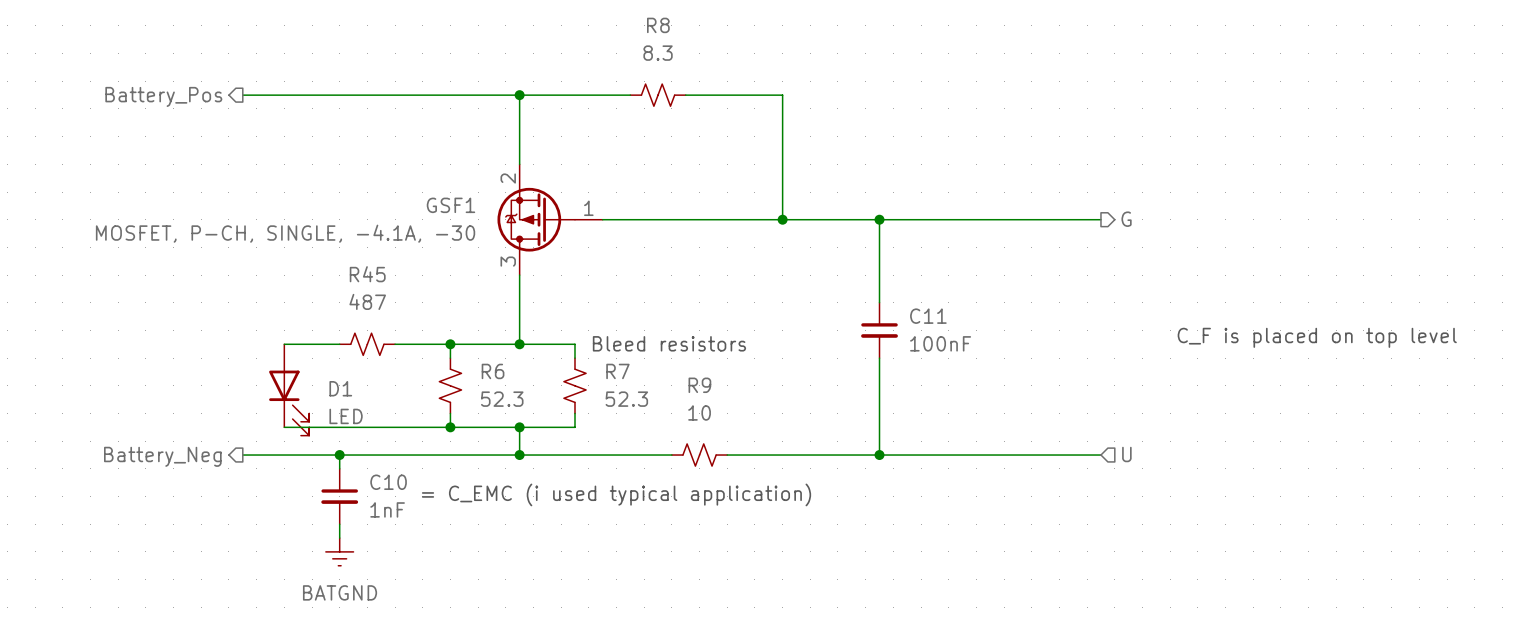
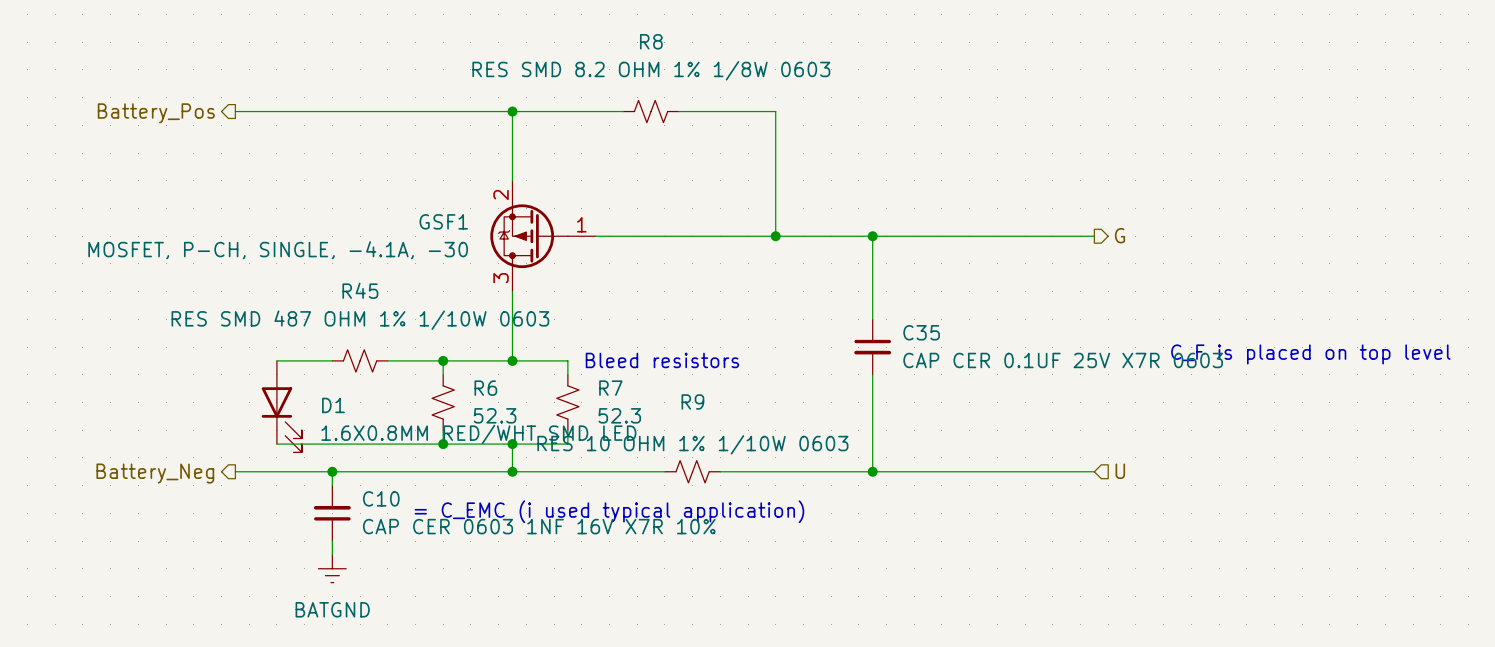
R8 value: 8.3 (658, 53) -> RES SMD 8.2 OHM 1% 1/8W 0603 (651, 70)
R45 value: 487 (367, 301) -> RES SMD 487 OHM 1% 1/10W 0603 (360, 320)
C11 name: C11 (928, 316) -> C35 (921, 332)
C11 value: 100nF (940, 343) -> CAP CER 0.1UF 25V X7R 0603 (1063, 360)
R9 value: 10 (699, 412) -> RES 10 OHM 1% 1/10W 0603 (692, 444)
D1 value: LED (346, 416) -> 1.6X0.8MM RED/WHT SMD LED (478, 434)
C10 rotation: 0° (339, 496) -> 180° (332, 513)
C10 value: 1nF (387, 509) -> CAP CER 0603 1NF 16V X7R 10% (539, 526)

